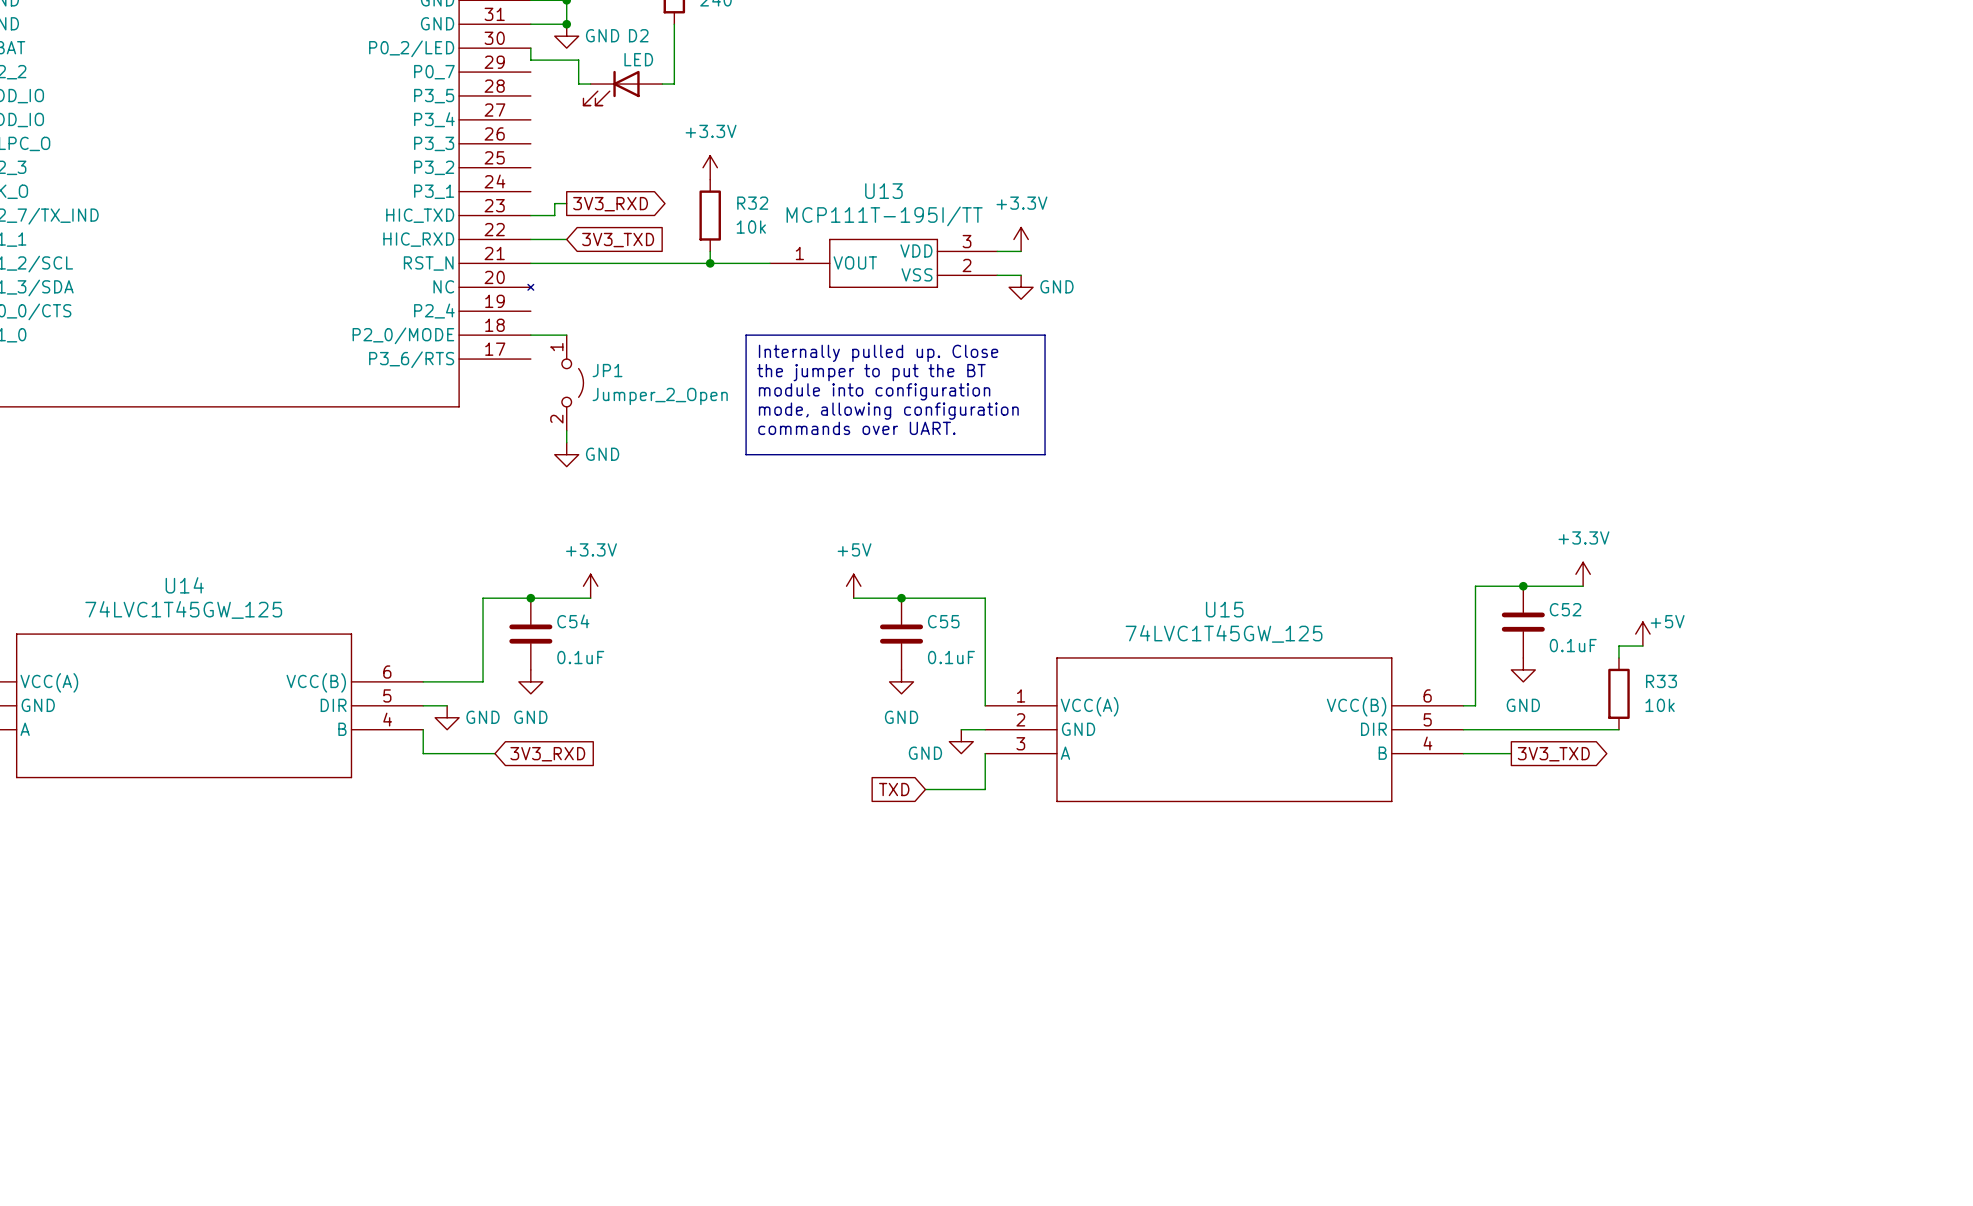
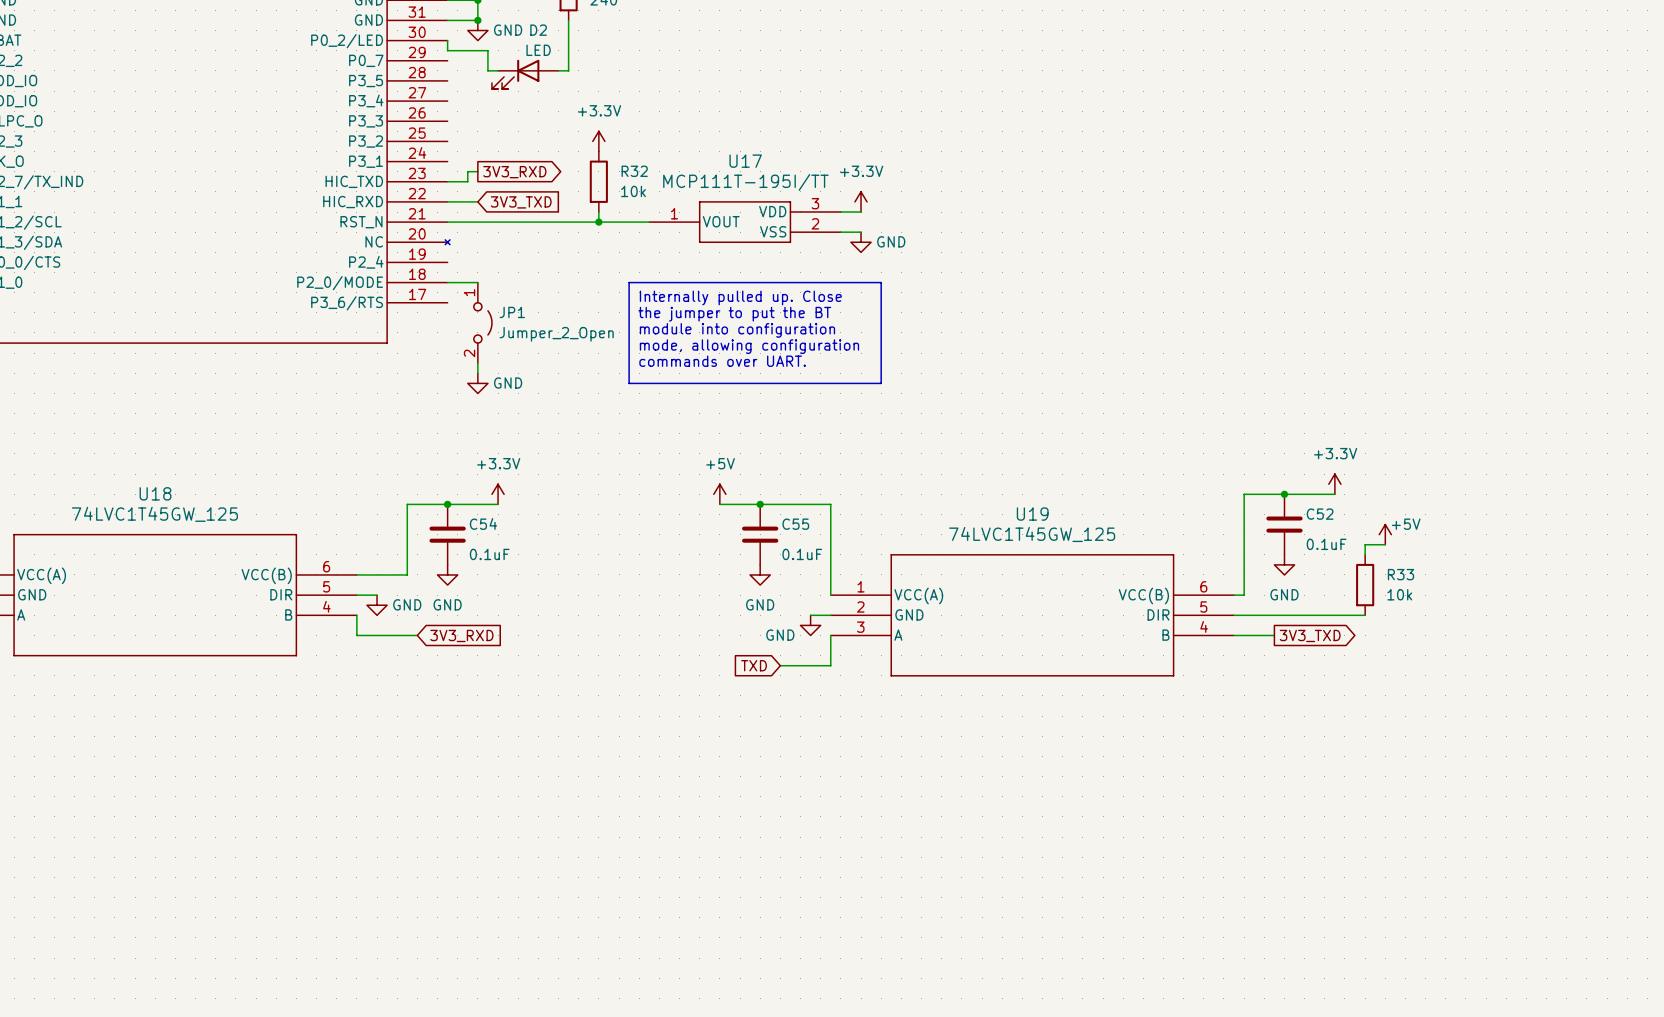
U13 name: U13 (883, 191) -> U17 (745, 161)
U14 name: U14 (184, 585) -> U18 (155, 493)
U15 name: U15 (1224, 609) -> U19 (1032, 514)

